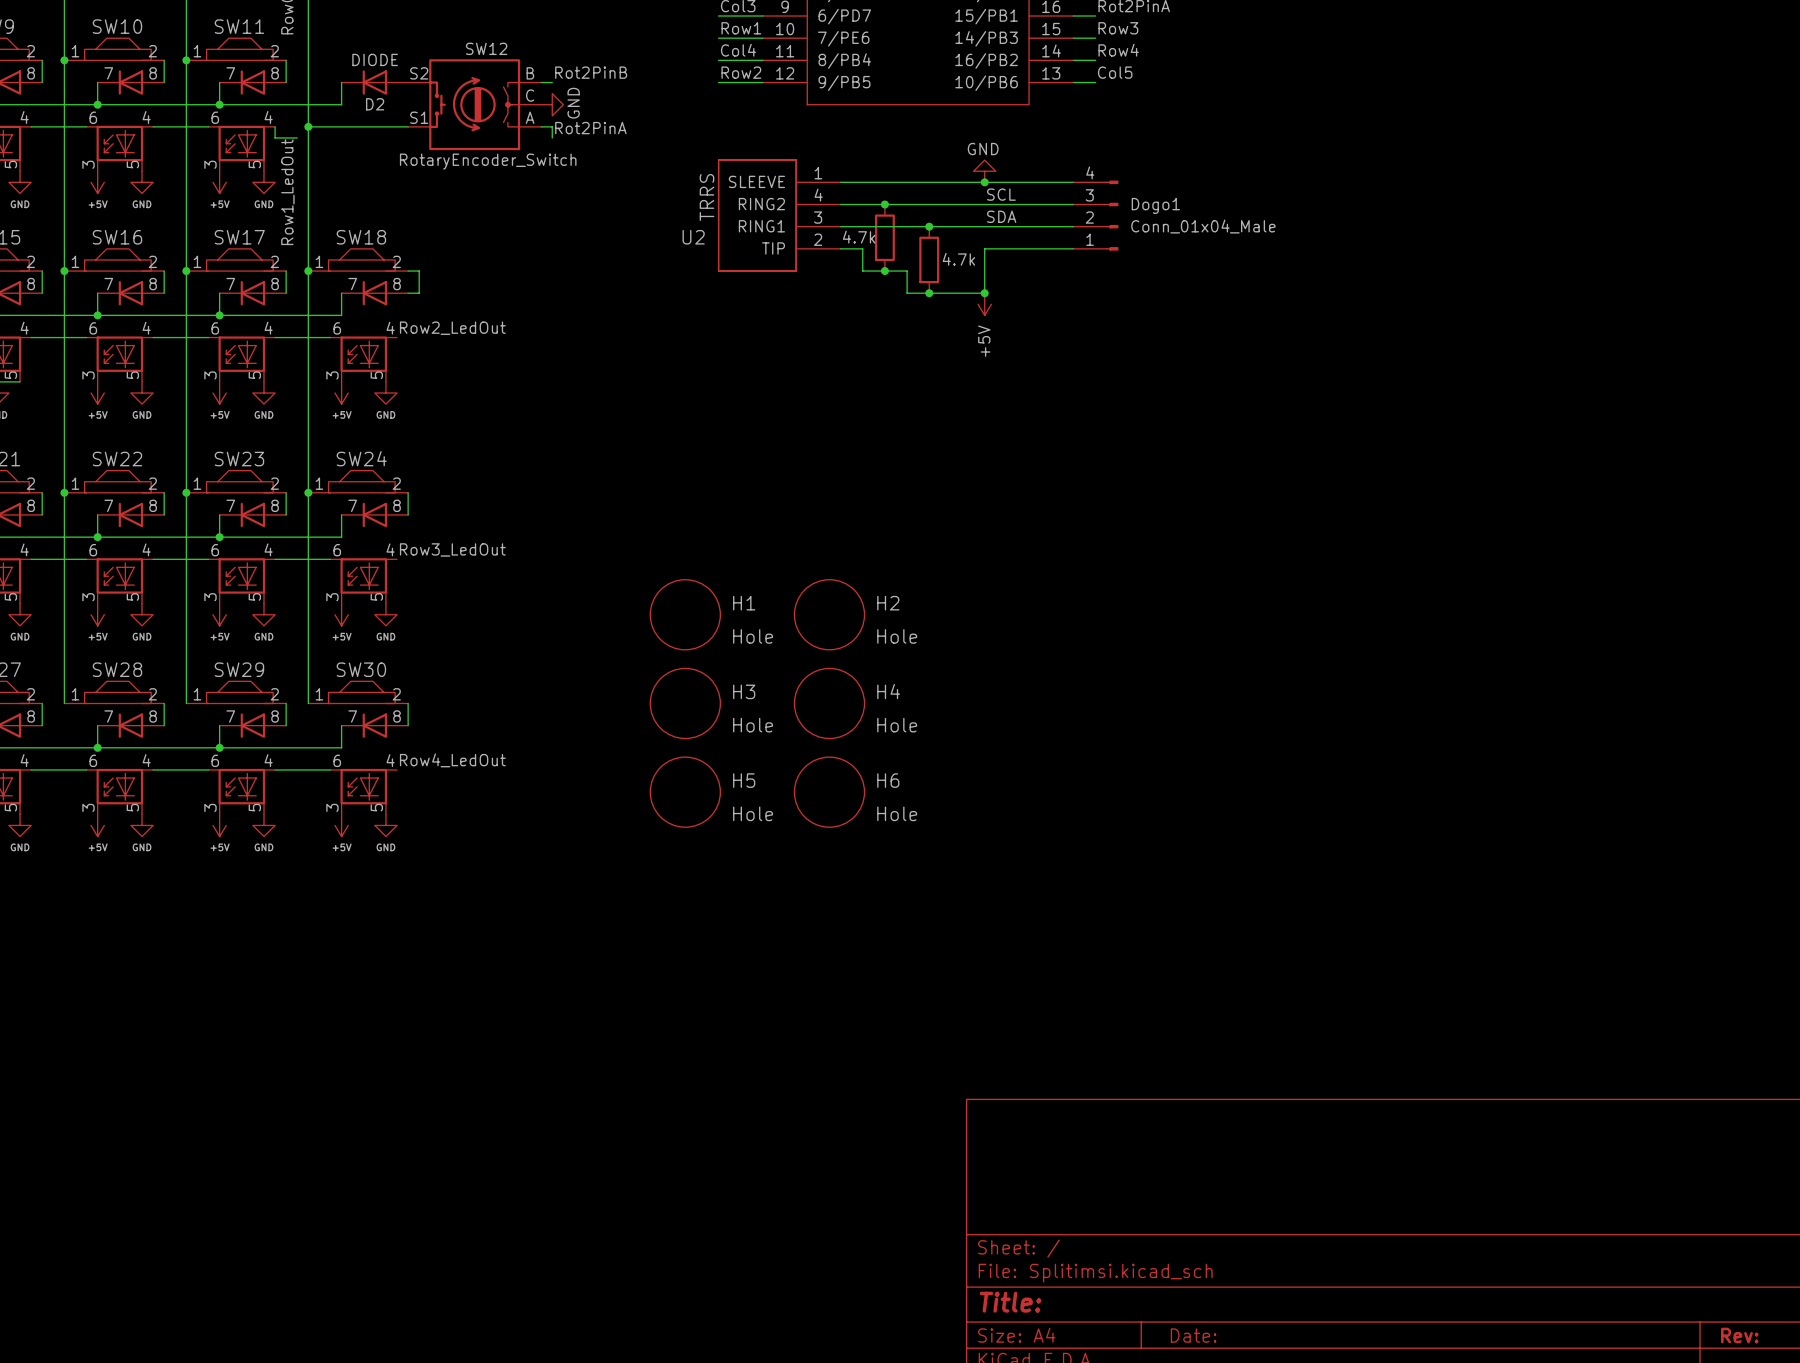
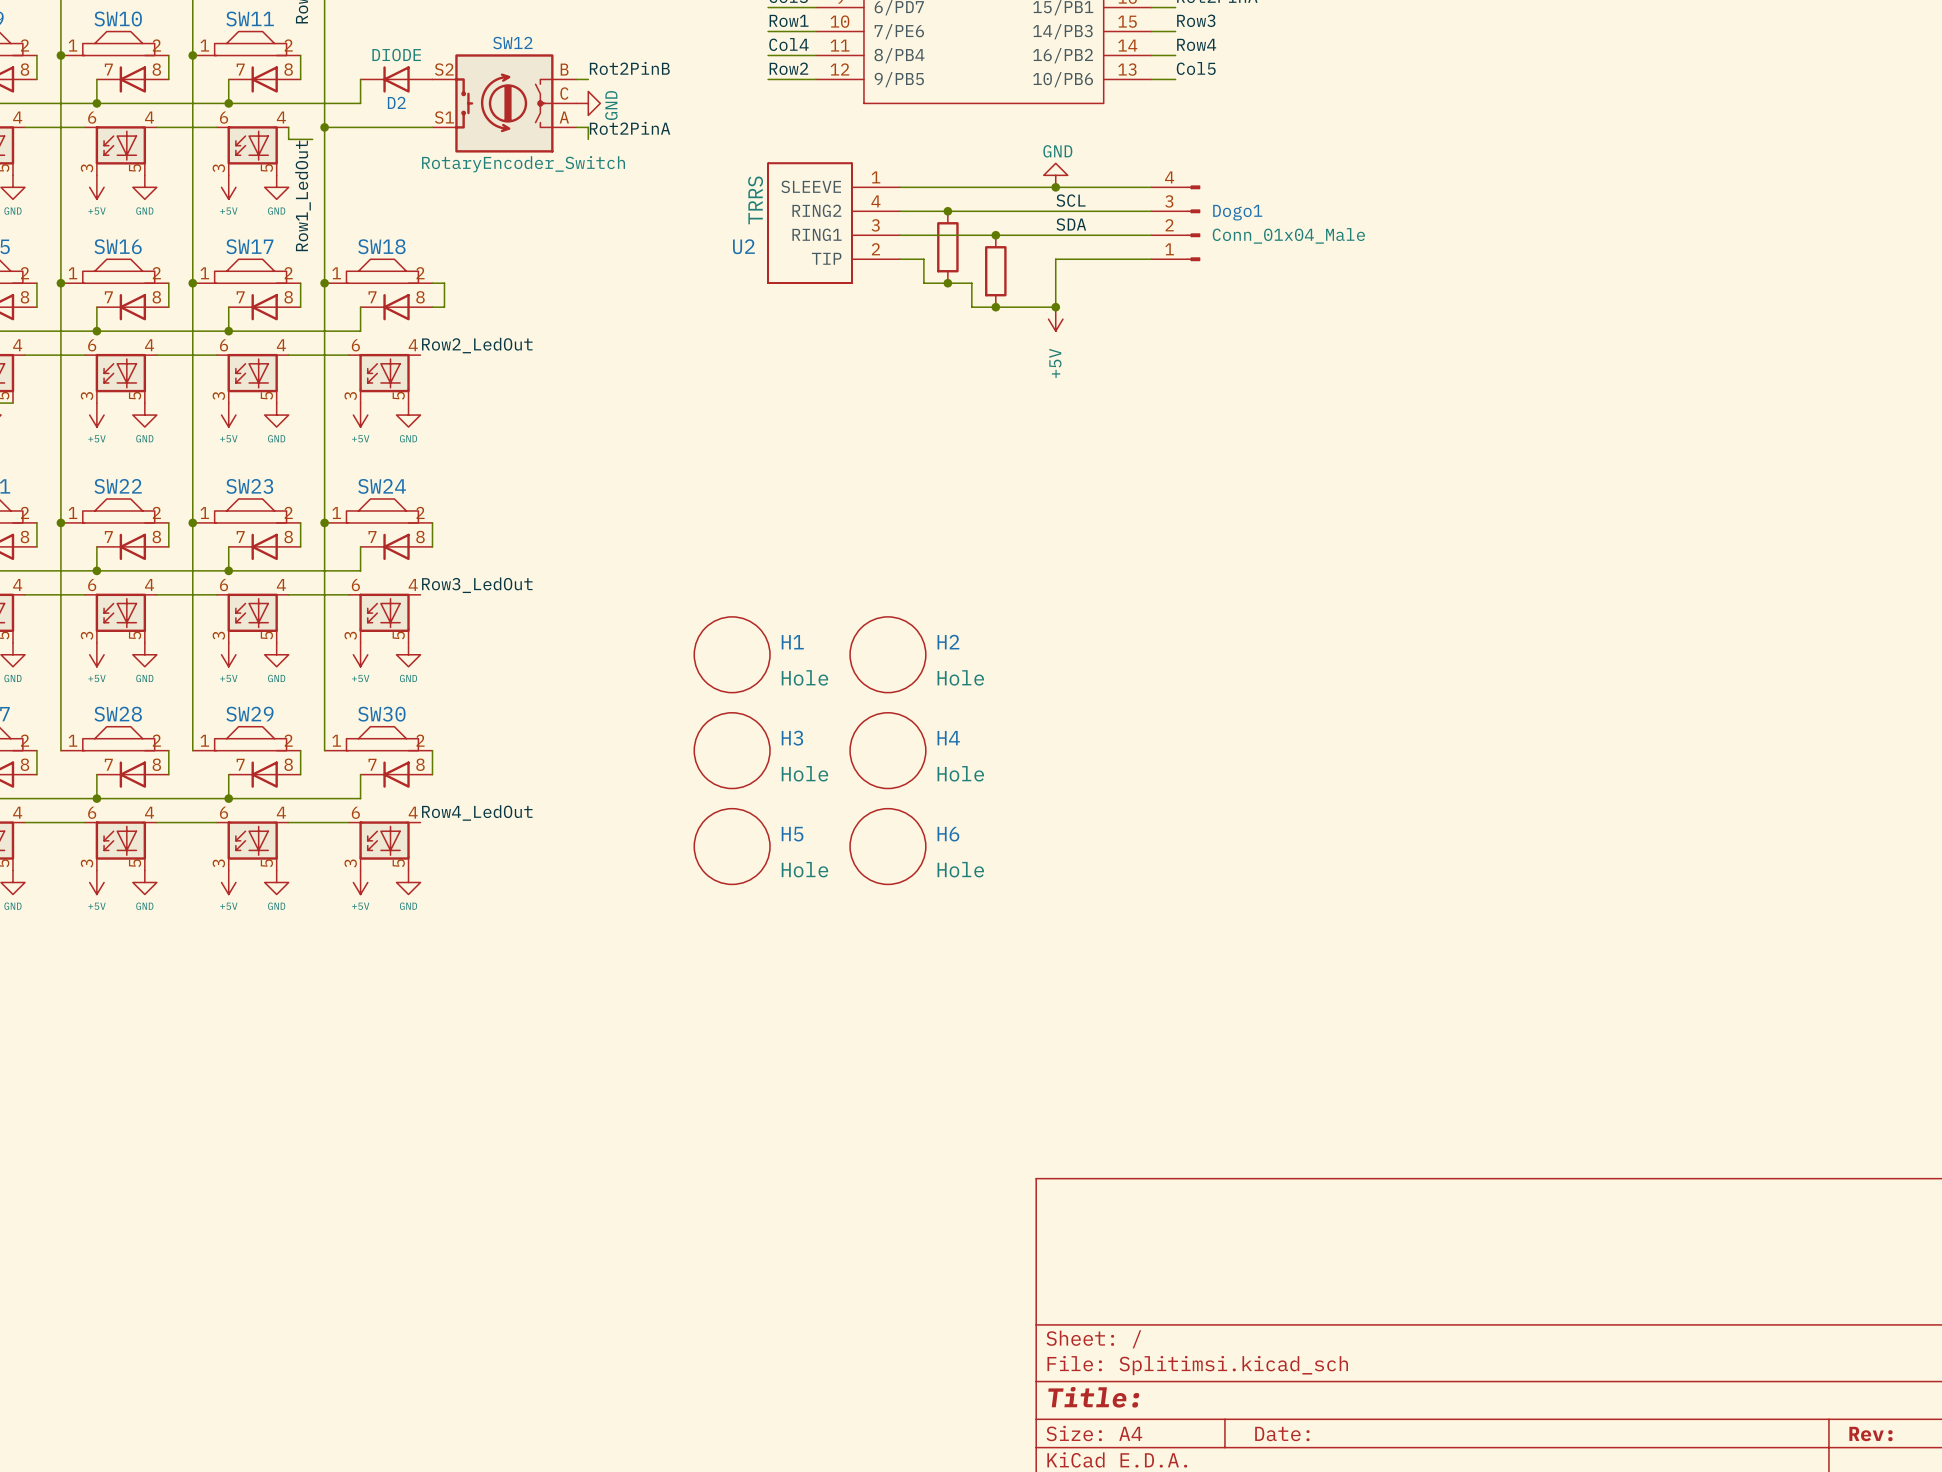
part value: 4.7k (859, 237) -> none
part value: 4.7k (958, 259) -> none

